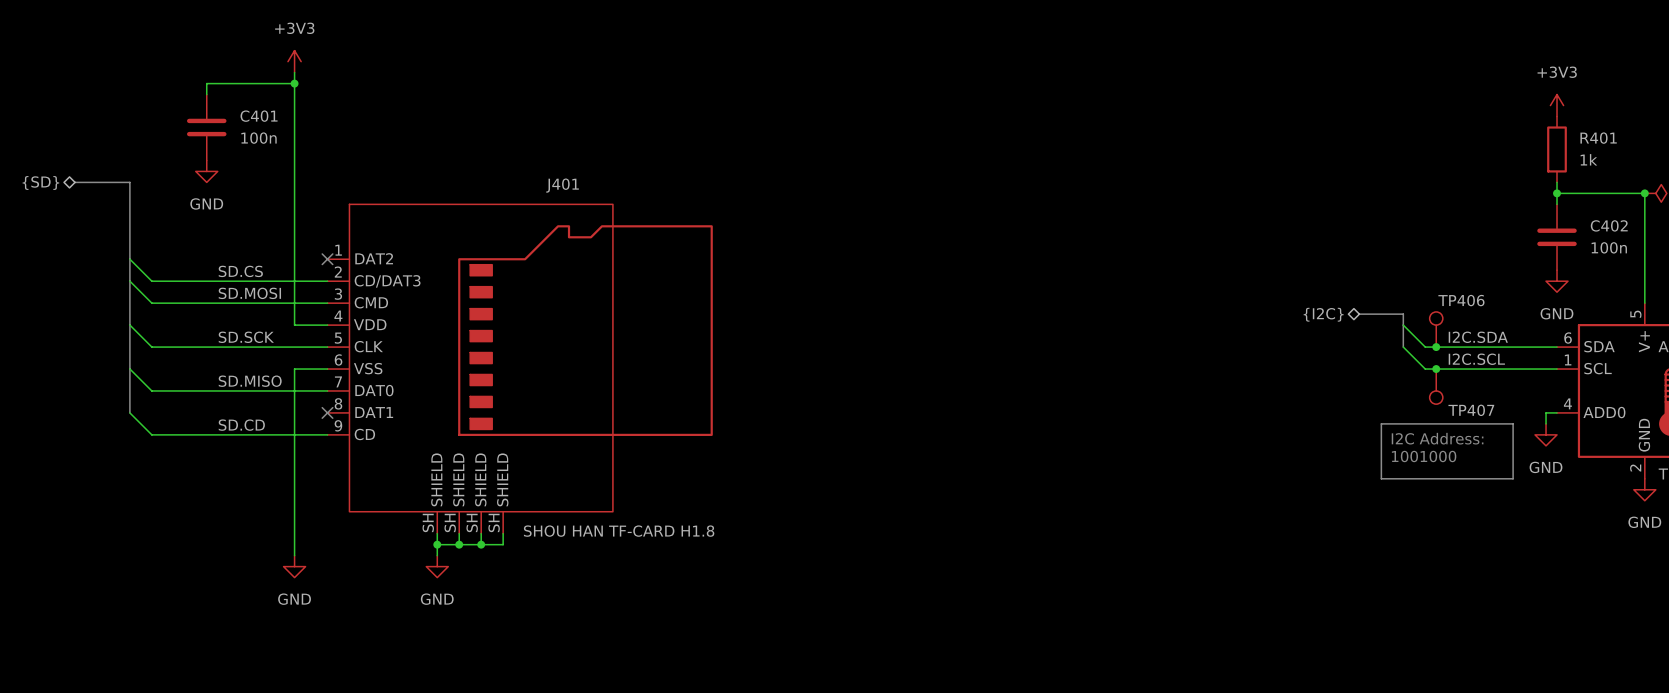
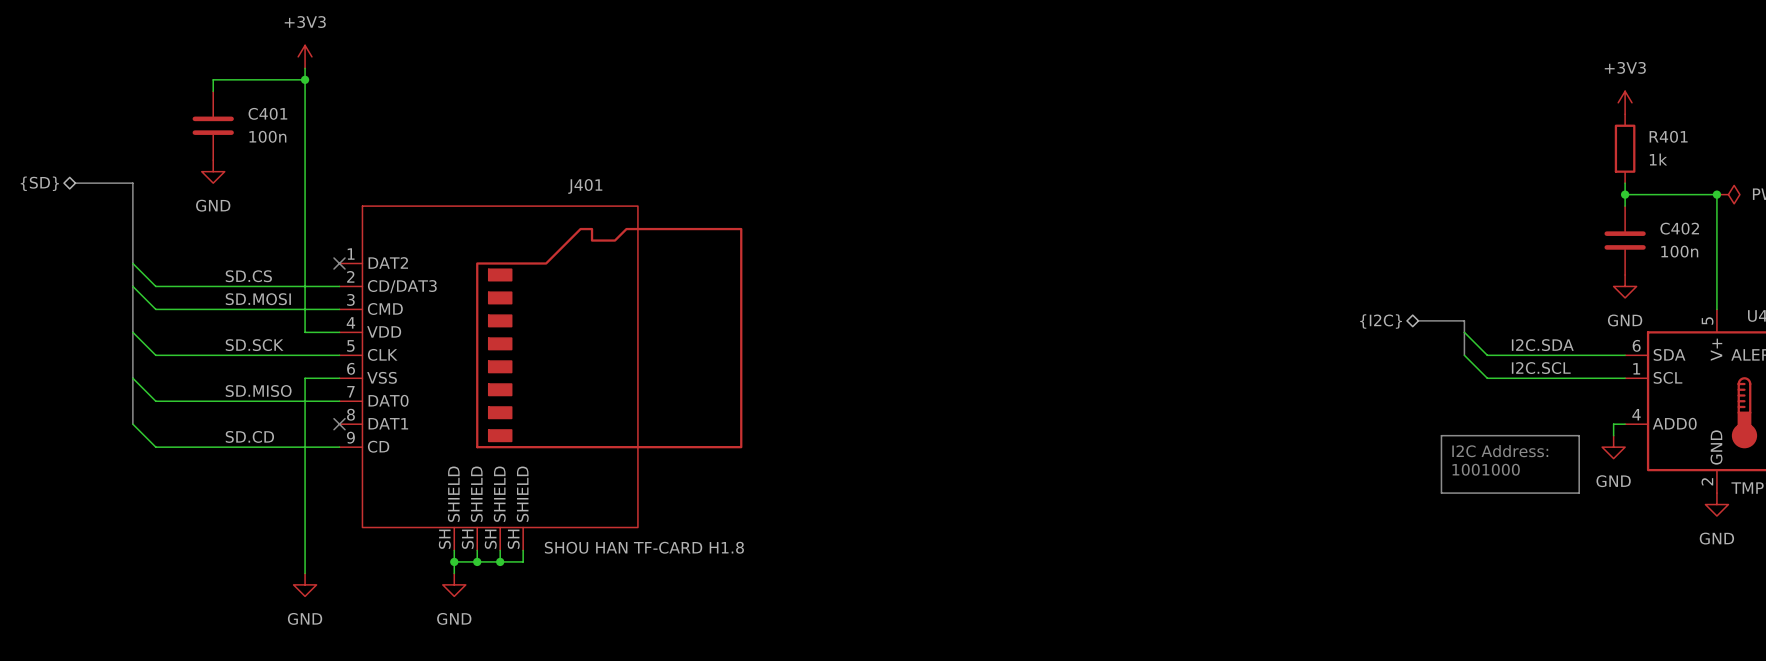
TP406: (1436, 329) -> none
junction: (1436, 347) -> none
junction: (1436, 369) -> none
TP407: (1436, 386) -> none

